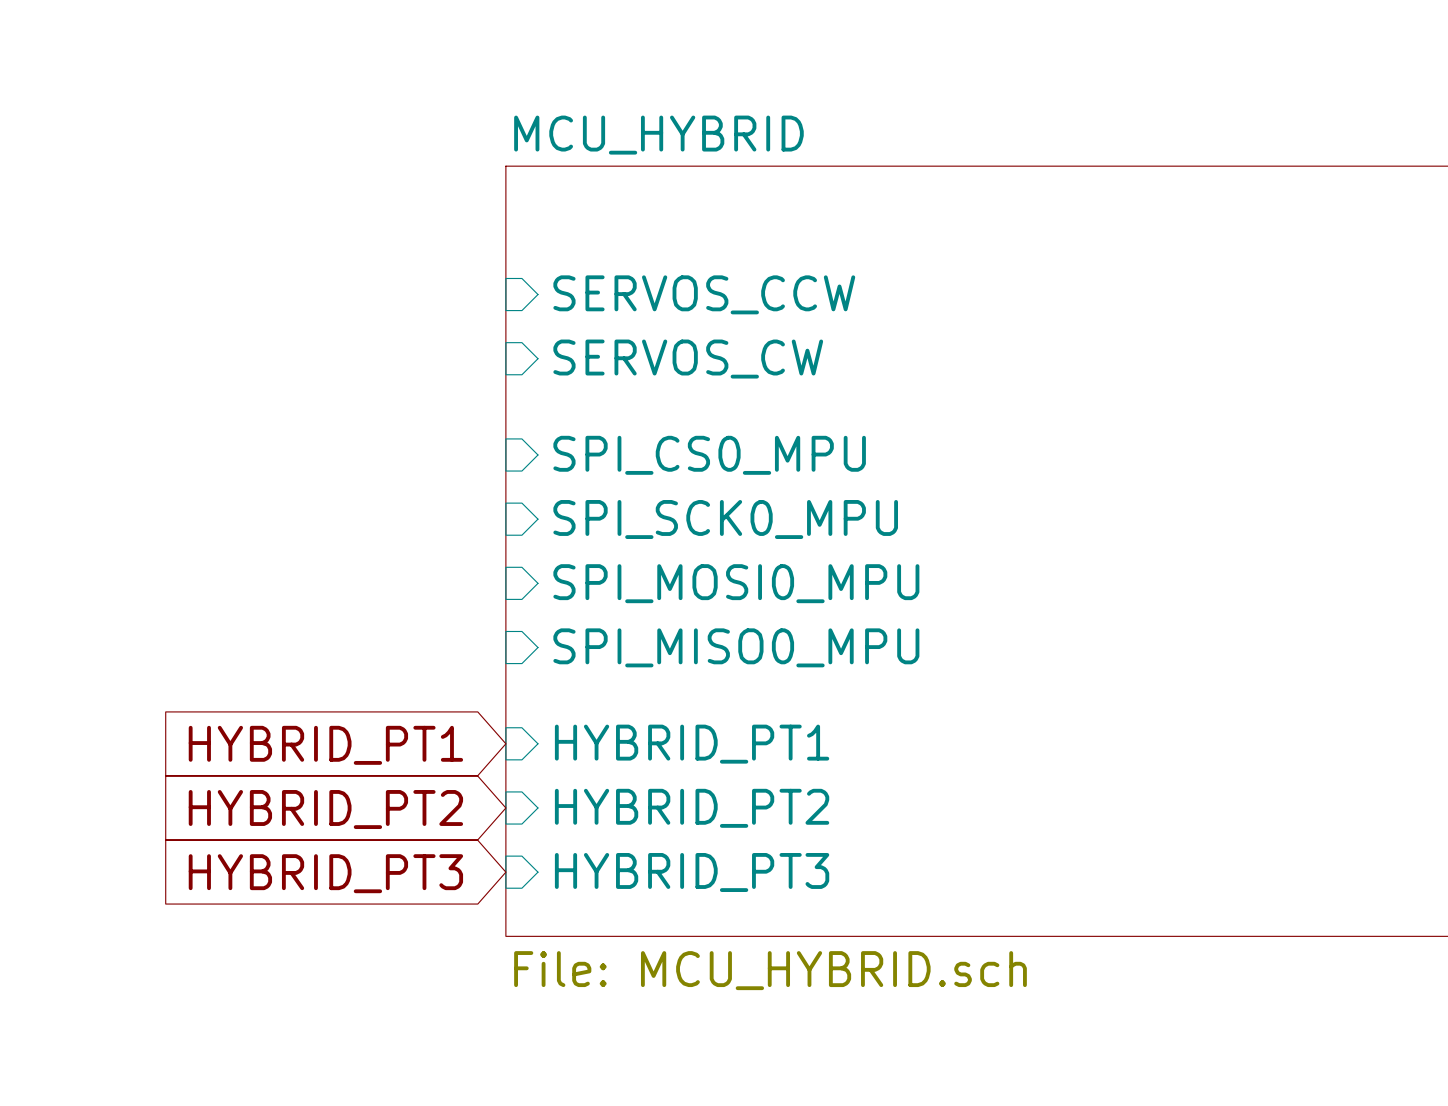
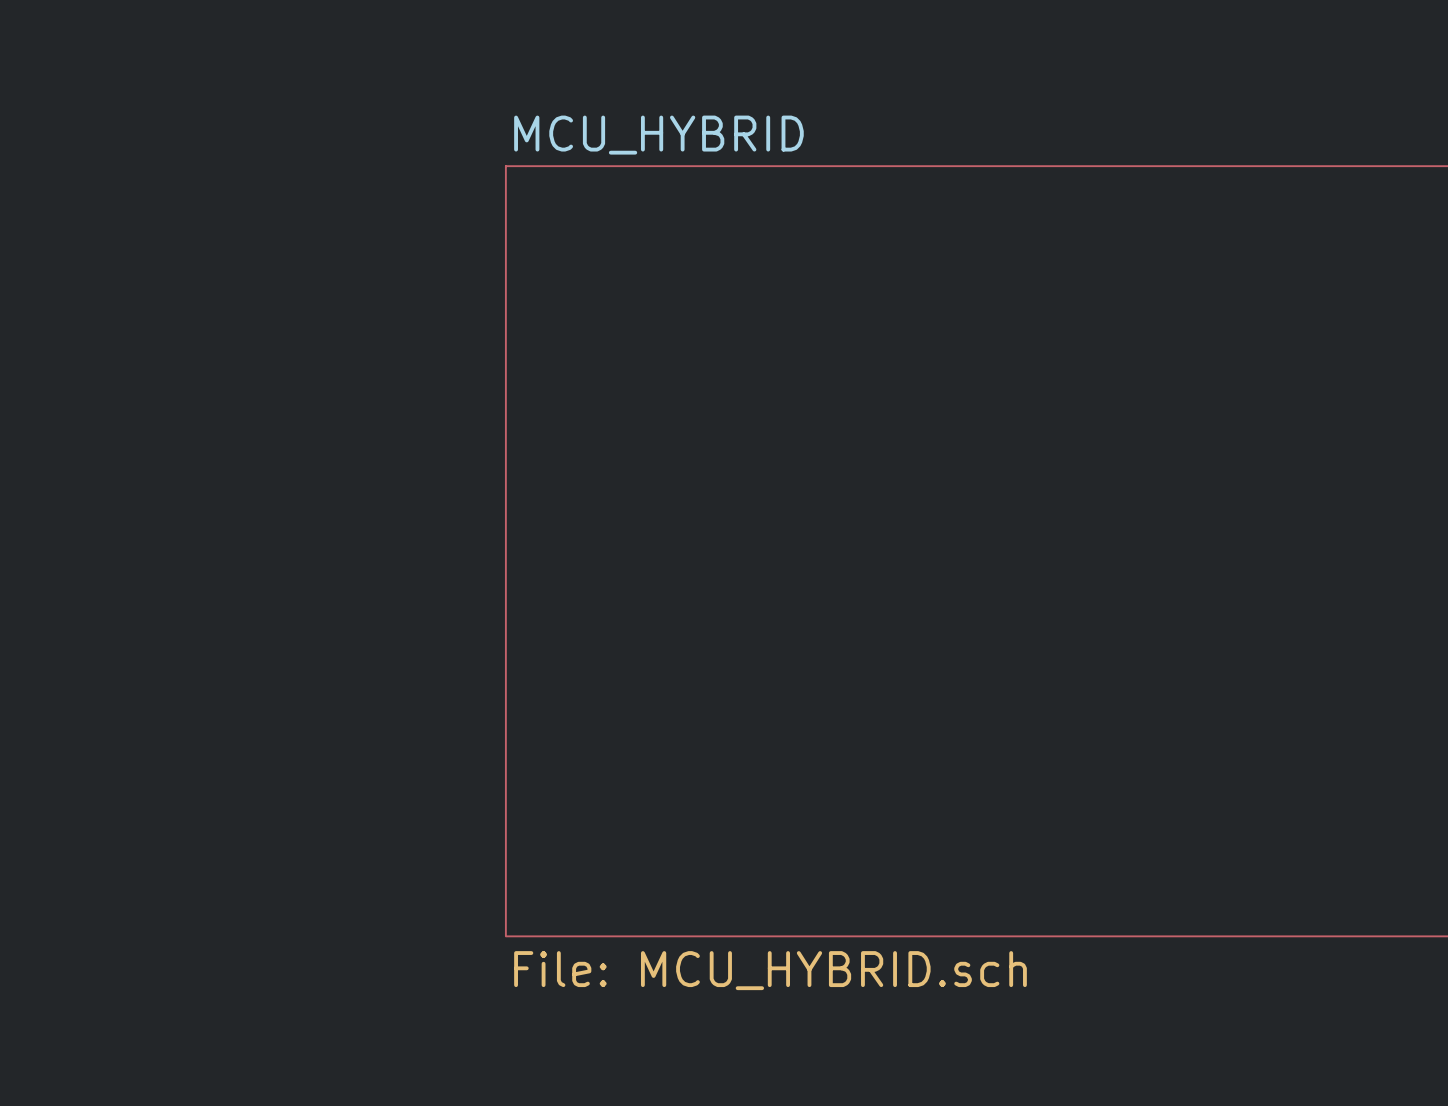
sheet pin: SERVOS_CCW (704, 294) -> none
sheet pin: SERVOS_CW (688, 359) -> none
sheet pin: SPI_CS0_MPU (709, 455) -> none
sheet pin: SPI_SCK0_MPU (725, 519) -> none
sheet pin: SPI_MOSI0_MPU (736, 583) -> none
sheet pin: SPI_MISO0_MPU (736, 647) -> none
sheet pin: HYBRID_PT1 (692, 744) -> none
global label: HYBRID_PT1 (325, 745) -> none
sheet pin: HYBRID_PT2 (692, 808) -> none
global label: HYBRID_PT2 (325, 809) -> none
sheet pin: HYBRID_PT3 (692, 872) -> none
global label: HYBRID_PT3 (325, 873) -> none

